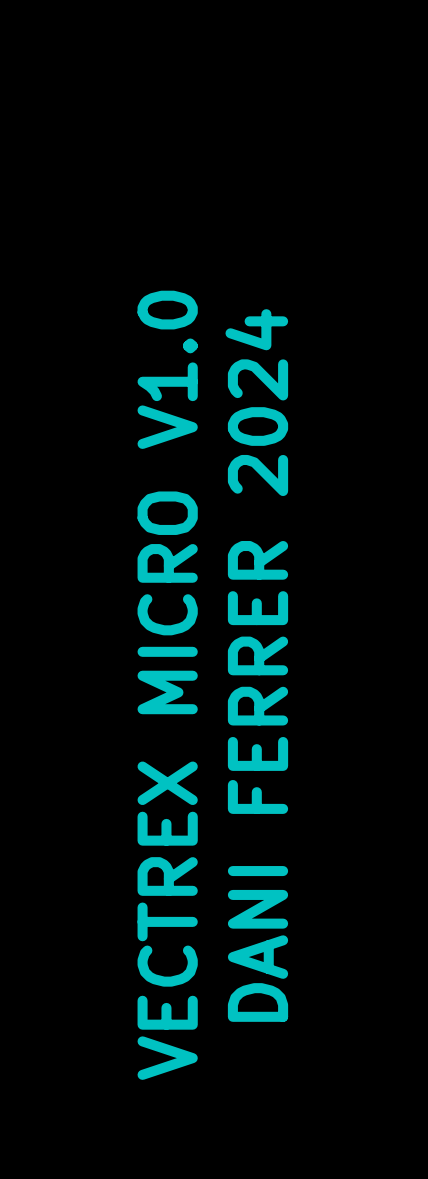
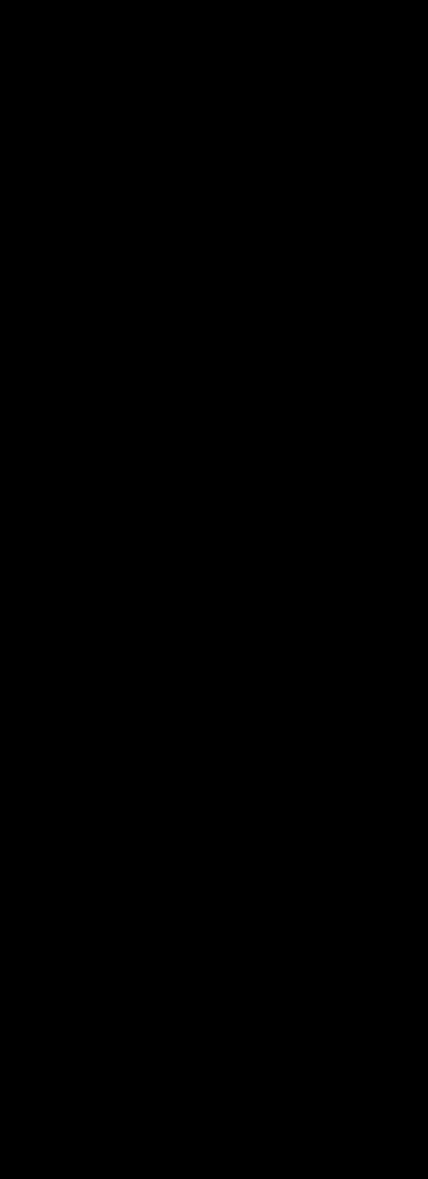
text: DANI FERRER 2024 (256, 665) -> none
text: VECTREX MICRO V1.0 (167, 685) -> none

